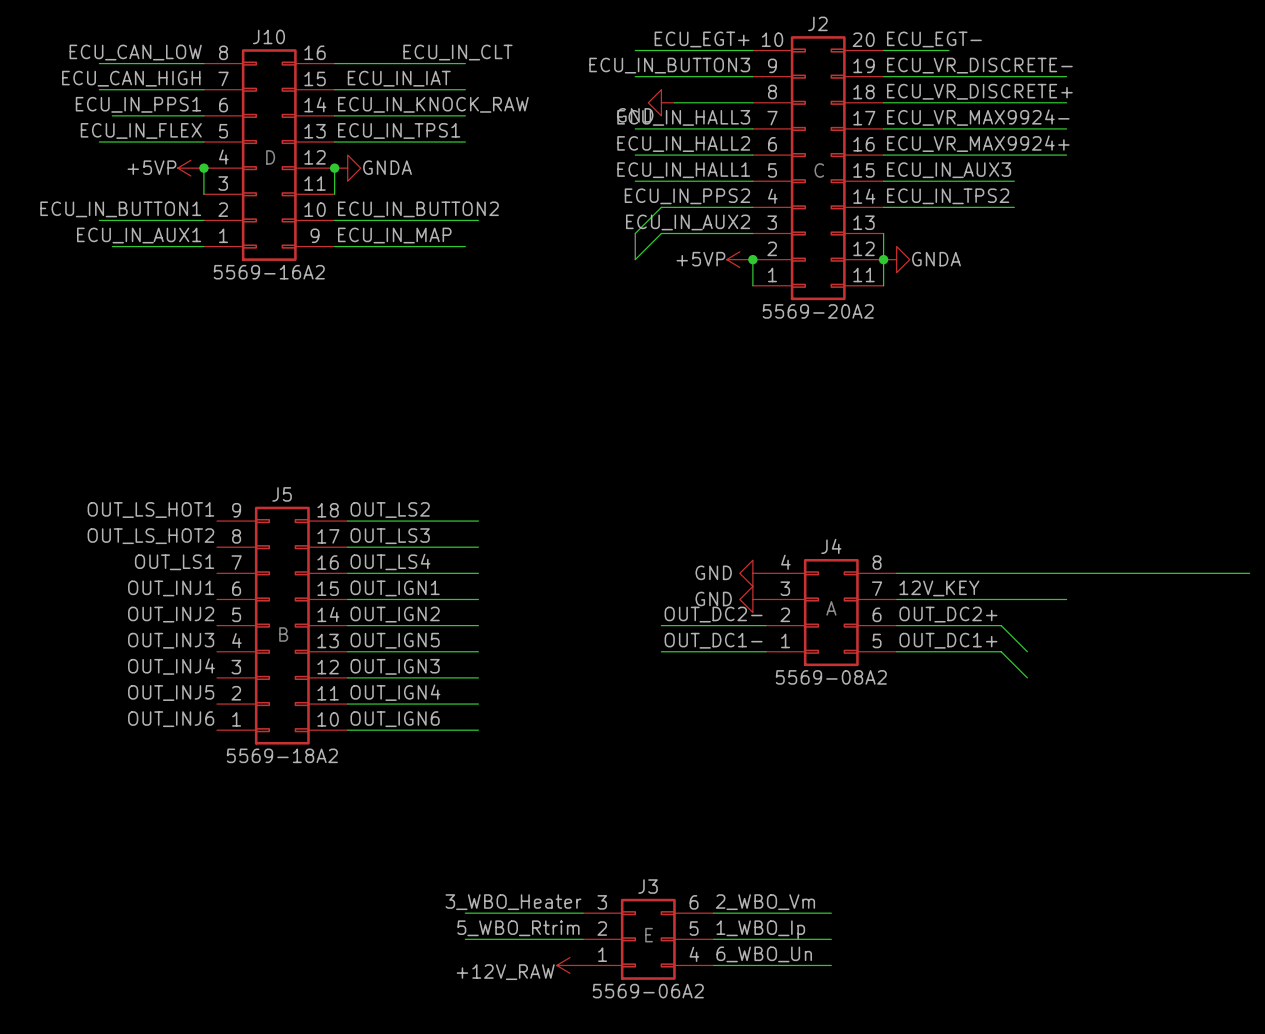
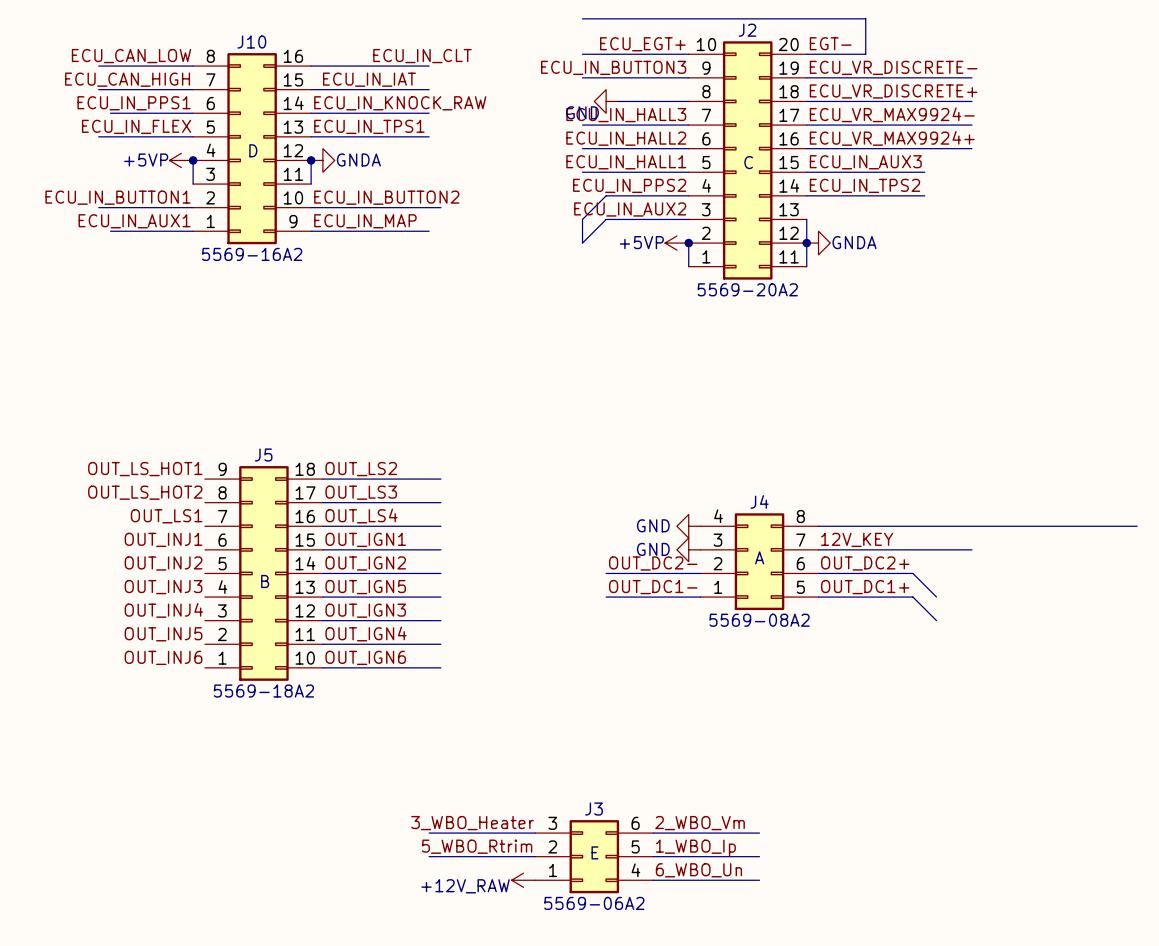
wire: none -> (582, 18) (865, 18) (865, 54)
label: ECU_EGT- (934, 39) -> EGT- (830, 43)

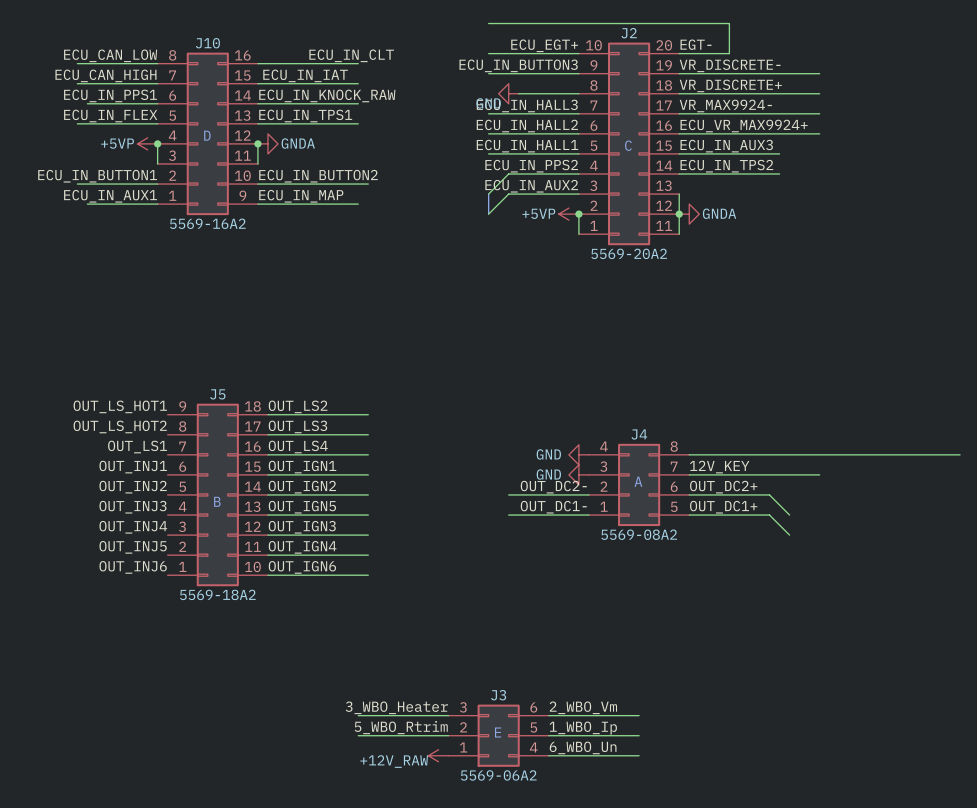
label: ECU_VR_DISCRETE- (893, 67) -> VR_DISCRETE- (730, 65)
label: ECU_VR_DISCRETE+ (893, 91) -> VR_DISCRETE+ (730, 85)
label: ECU_VR_MAX9924- (892, 114) -> VR_MAX9924- (725, 105)

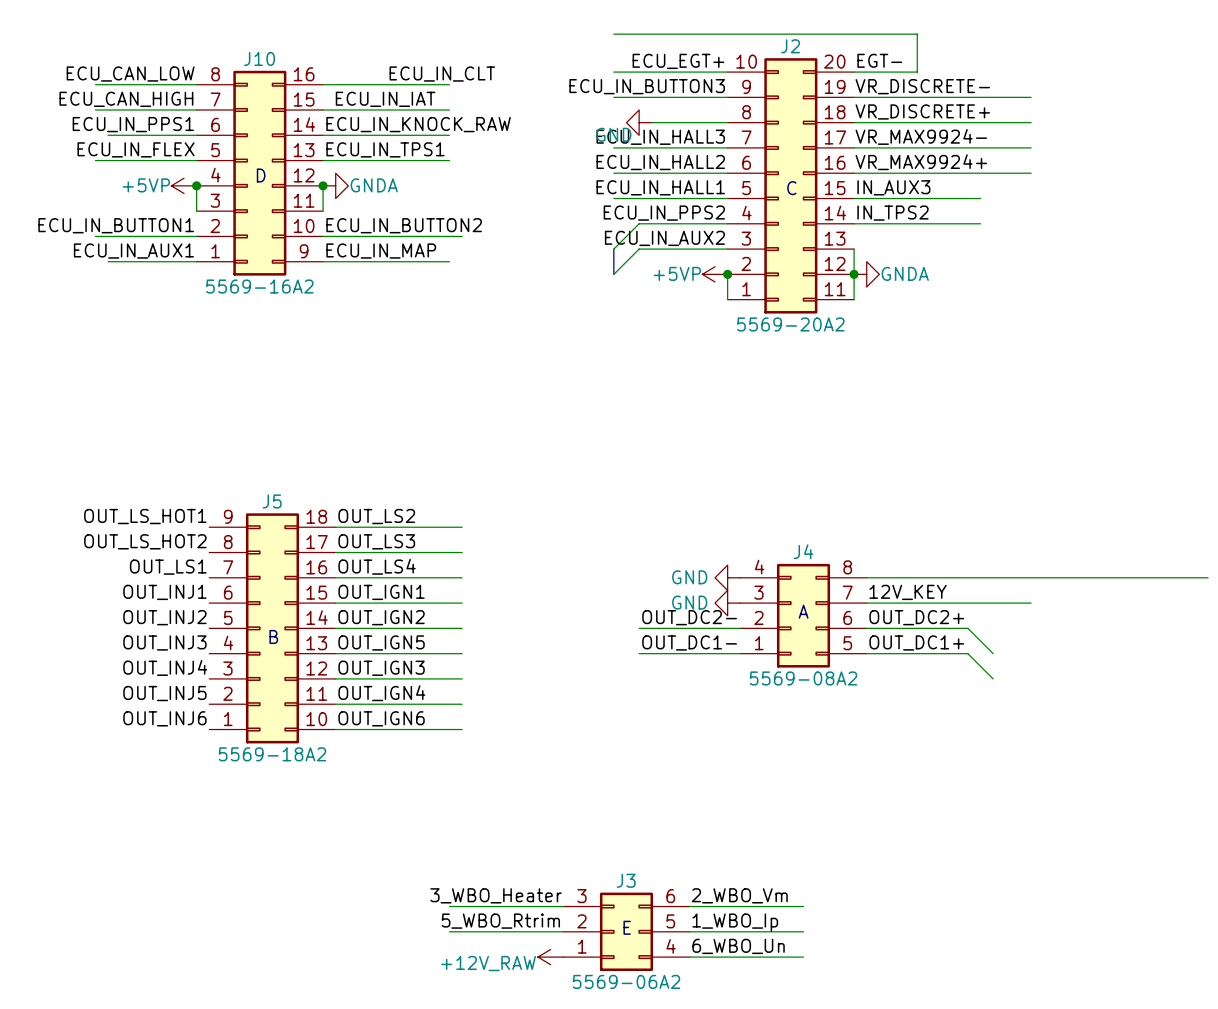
label: ECU_VR_MAX9924+ (744, 126) -> VR_MAX9924+ (921, 162)
label: ECU_IN_AUX3 (726, 146) -> IN_AUX3 (893, 187)
label: ECU_IN_TPS2 (726, 166) -> IN_TPS2 (893, 213)

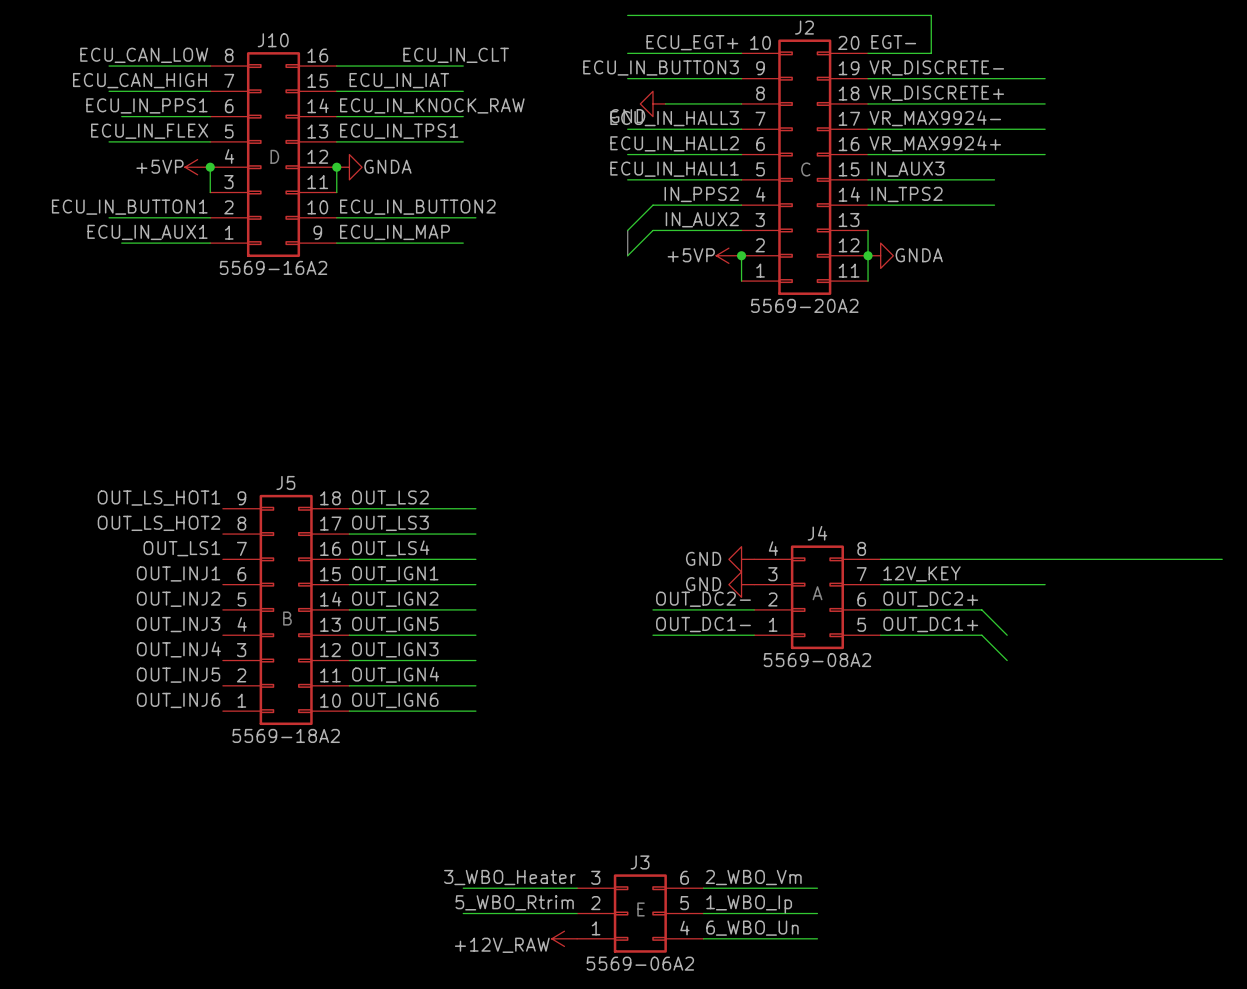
label: ECU_IN_PPS2 (664, 213) -> IN_PPS2 (701, 194)
label: ECU_IN_AUX2 (664, 238) -> IN_AUX2 (702, 219)

